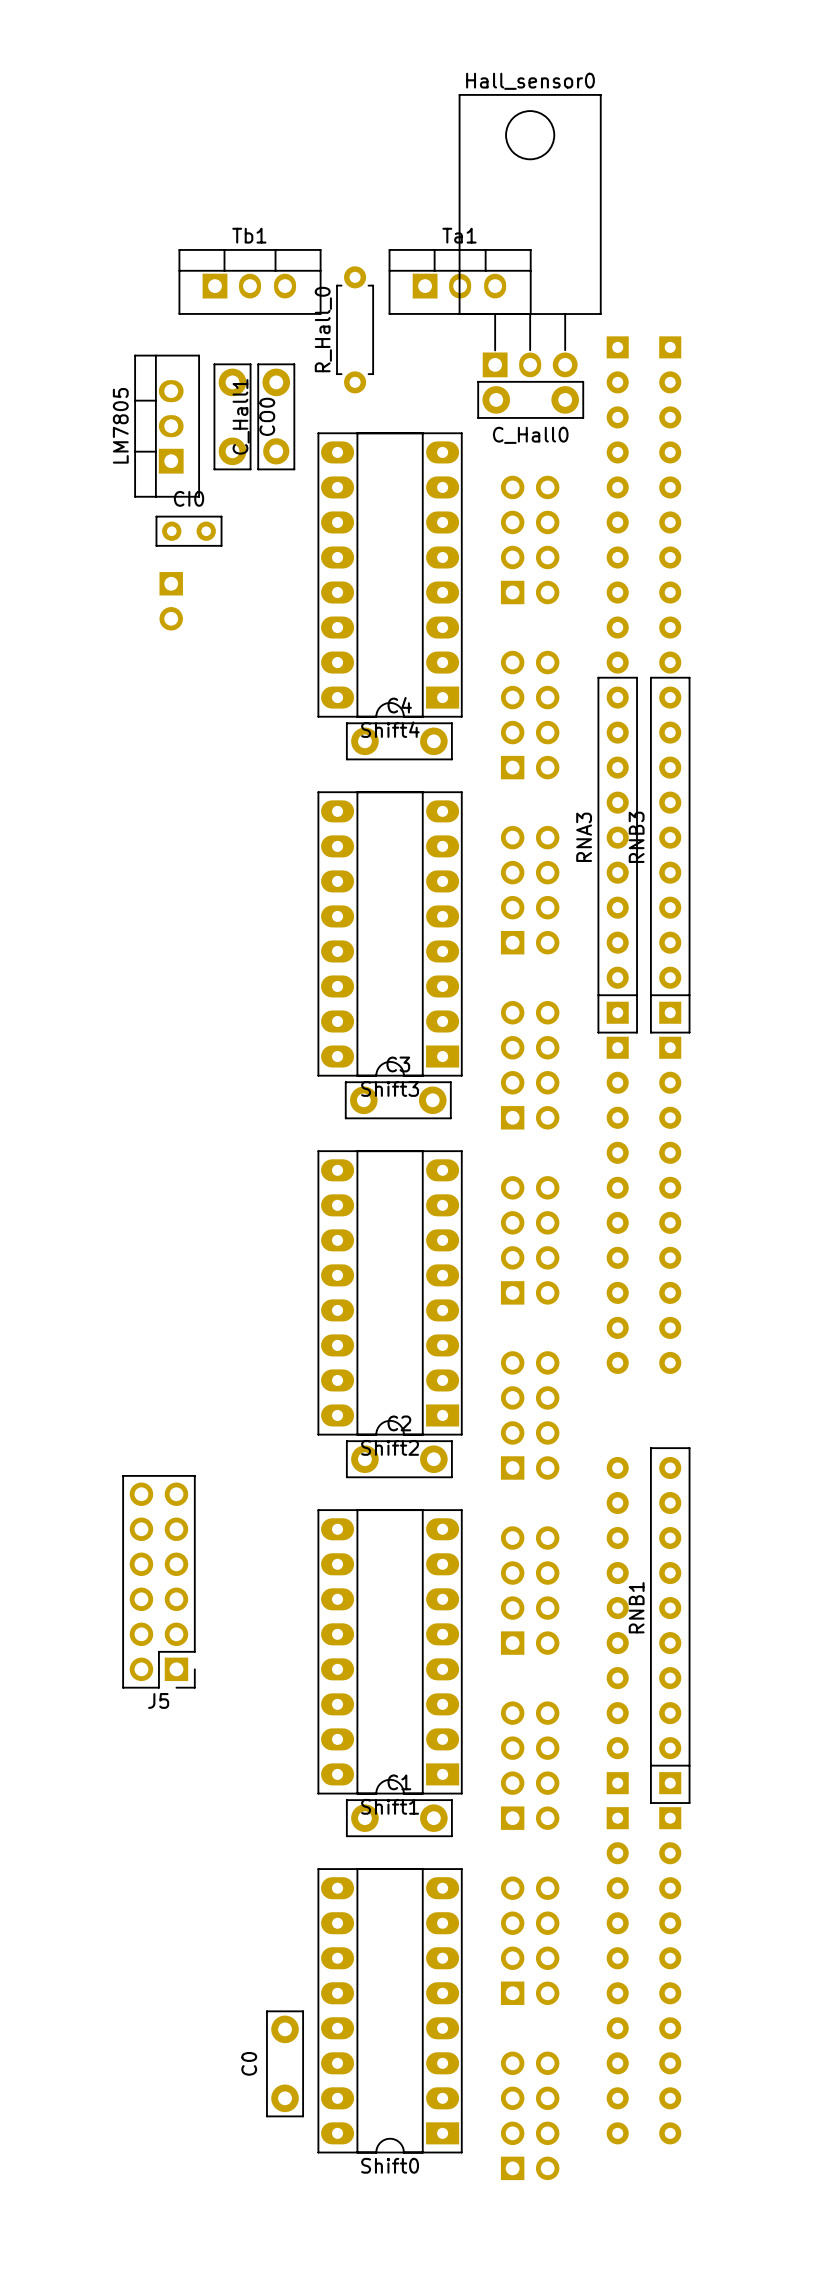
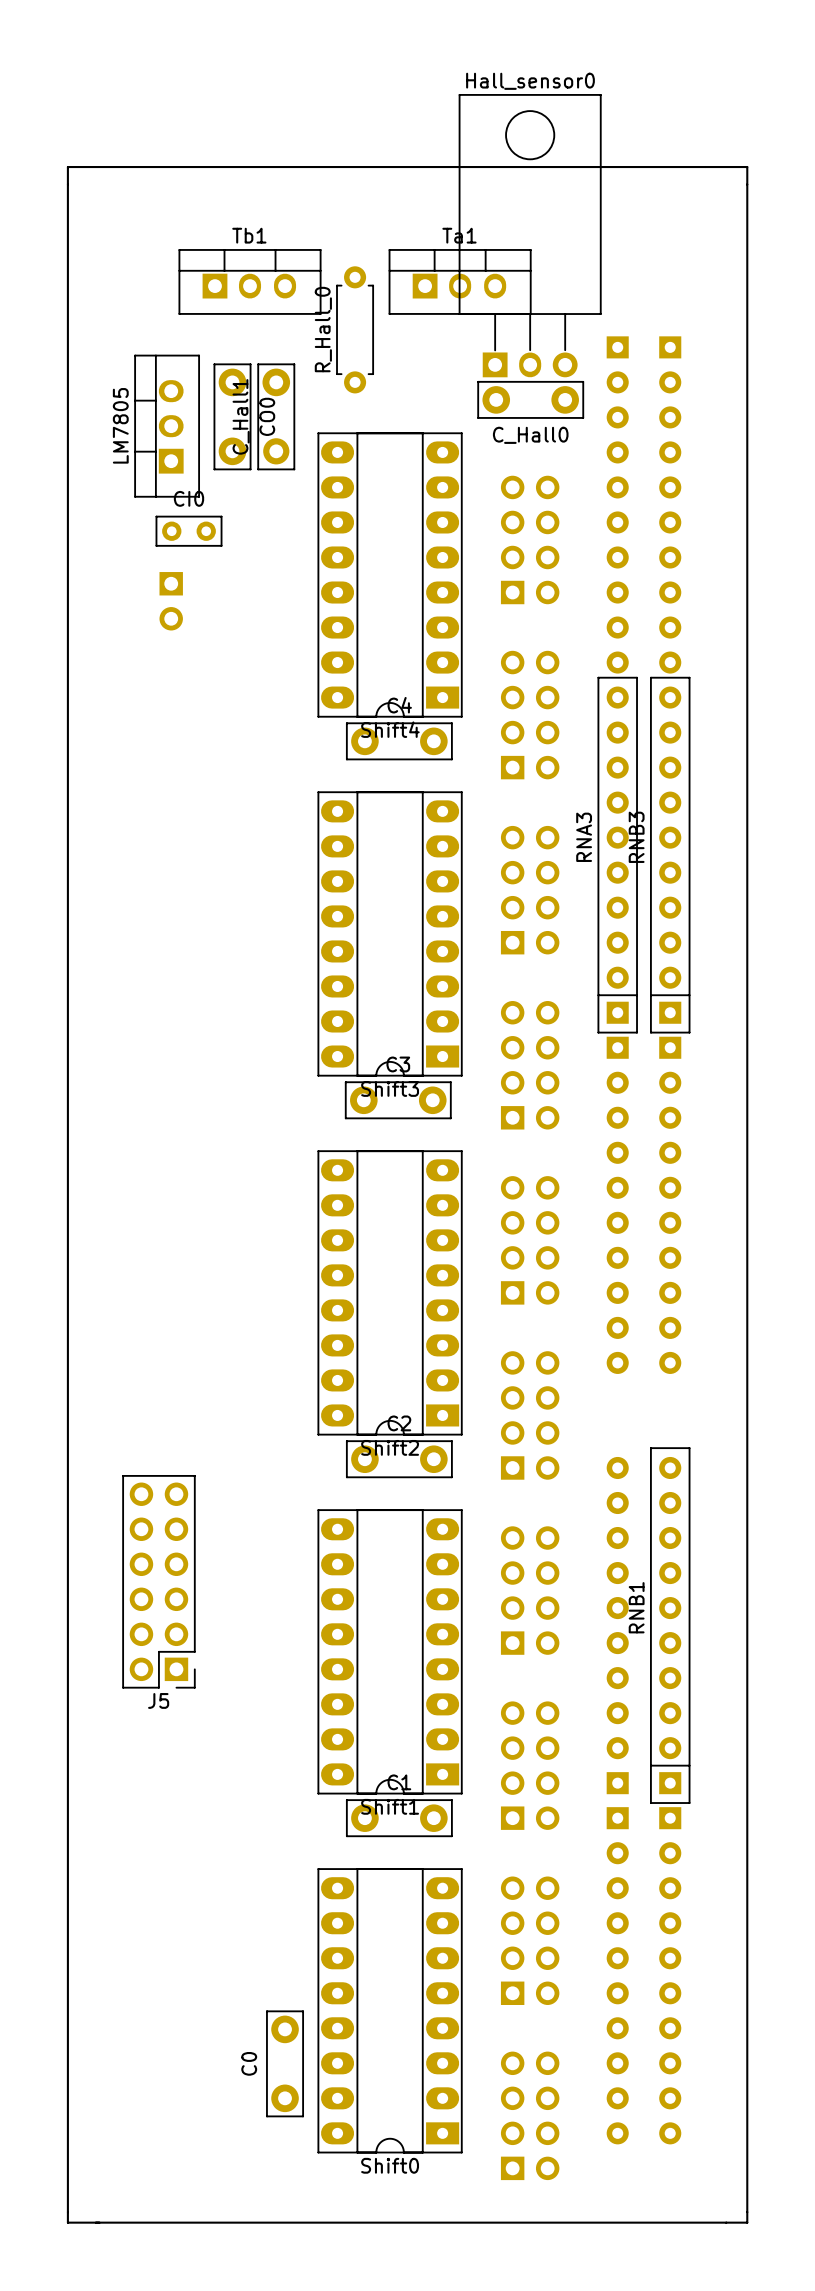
board edge: none -> (67, 167) (67, 2222) (747, 2222) (747, 167) (67, 167)

